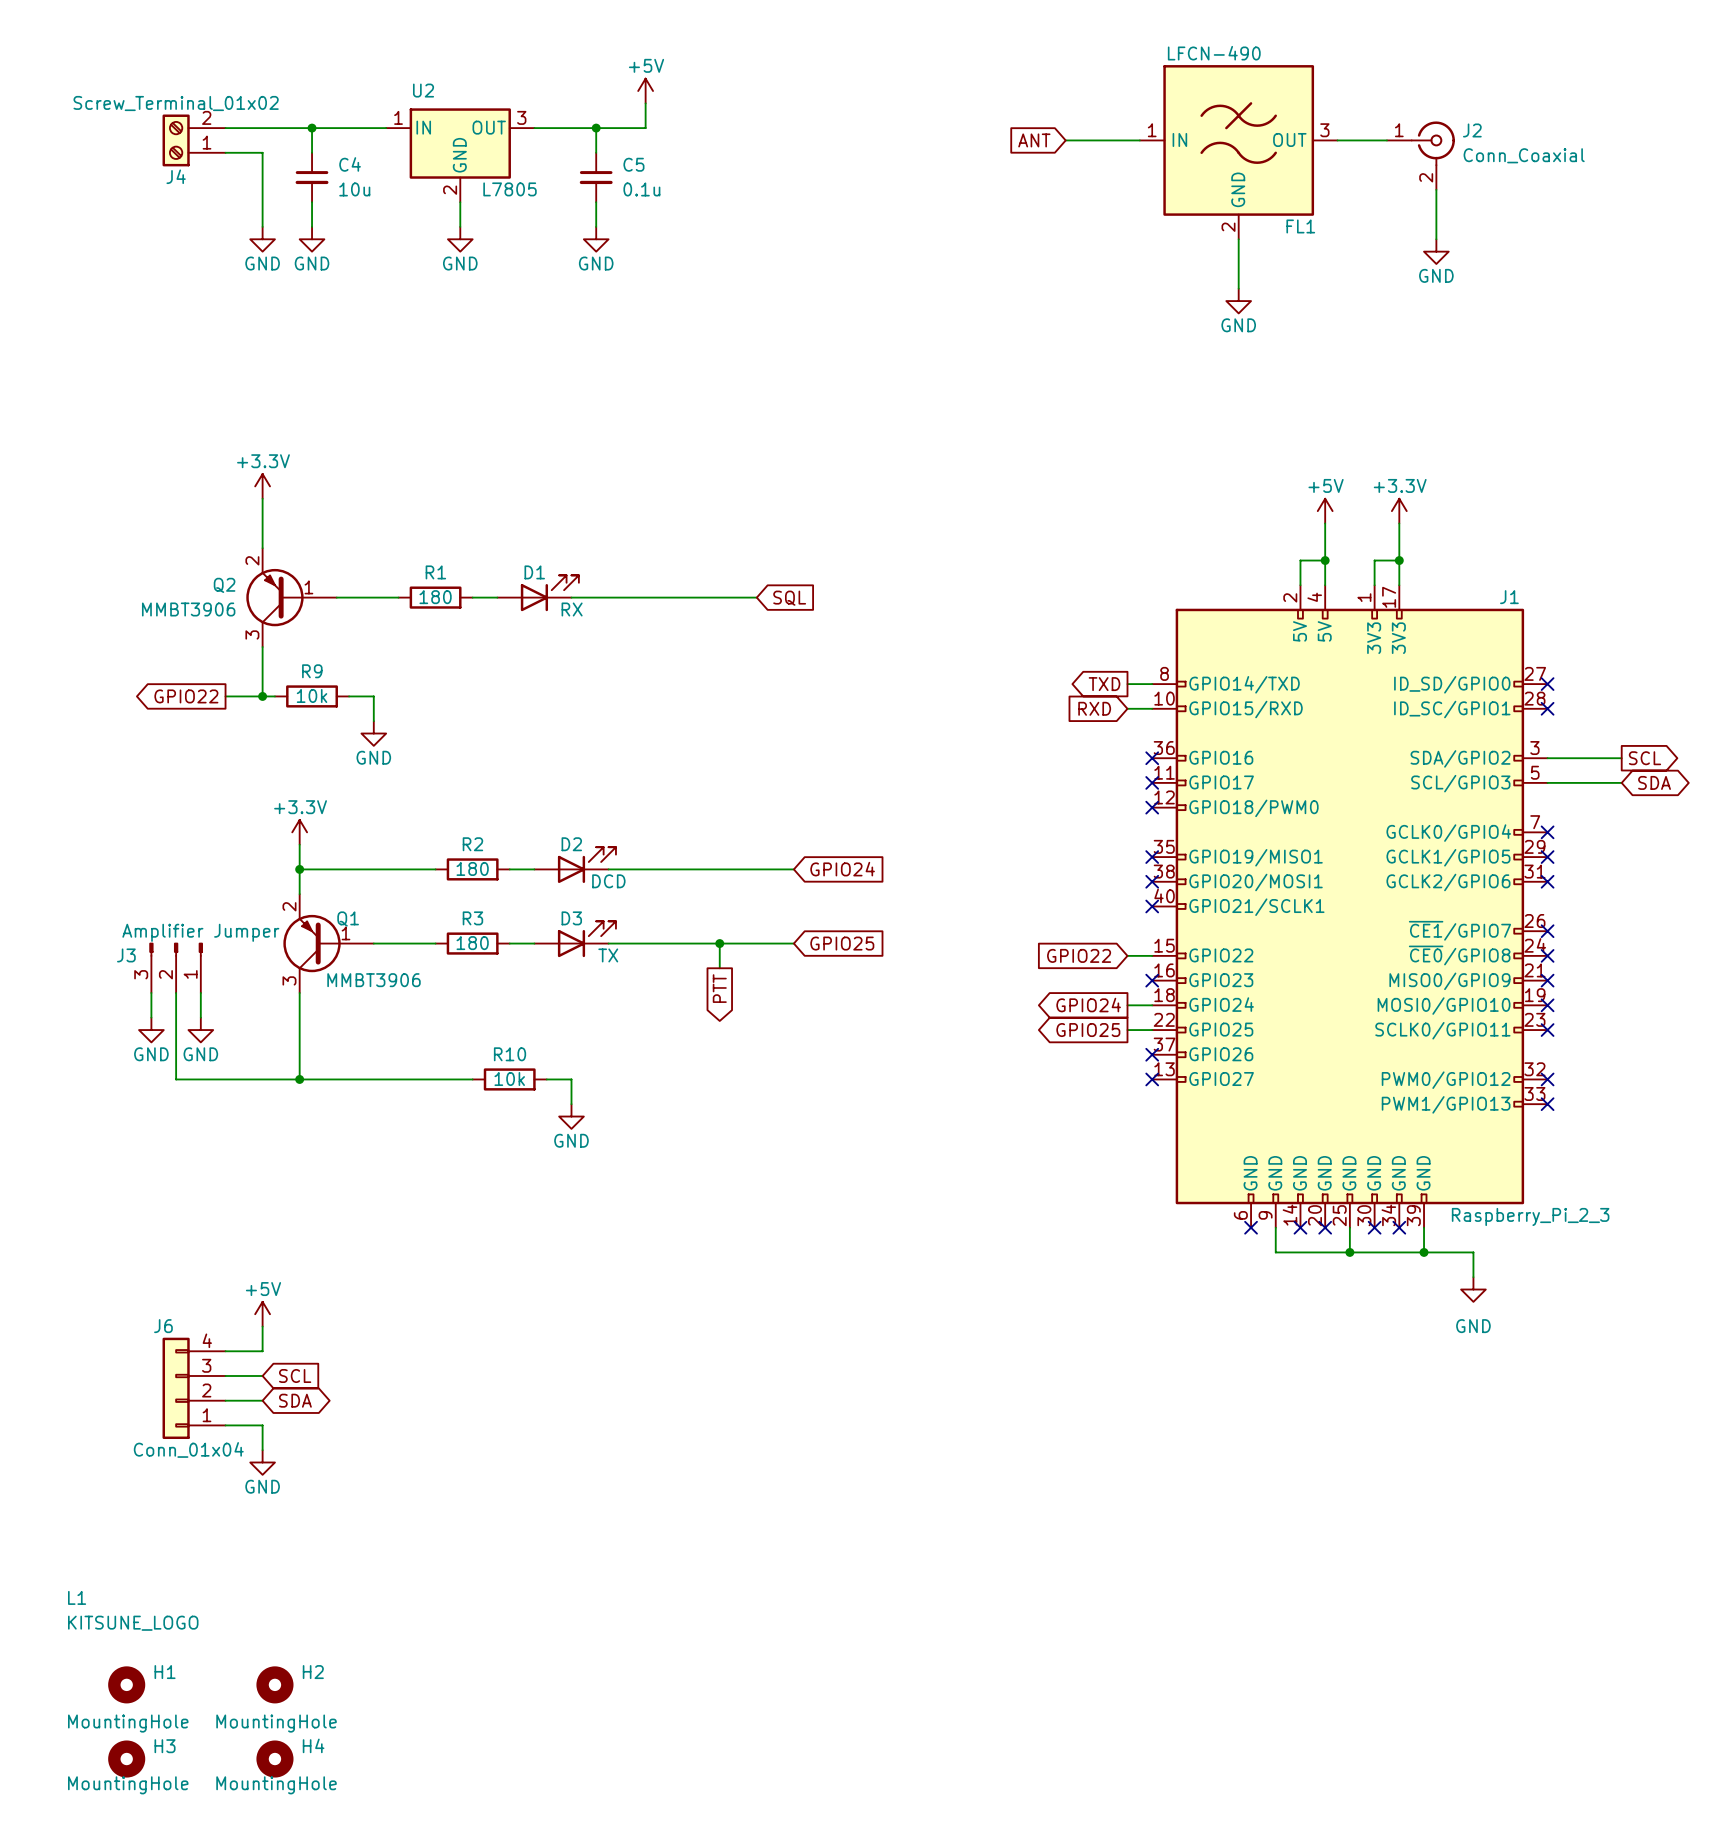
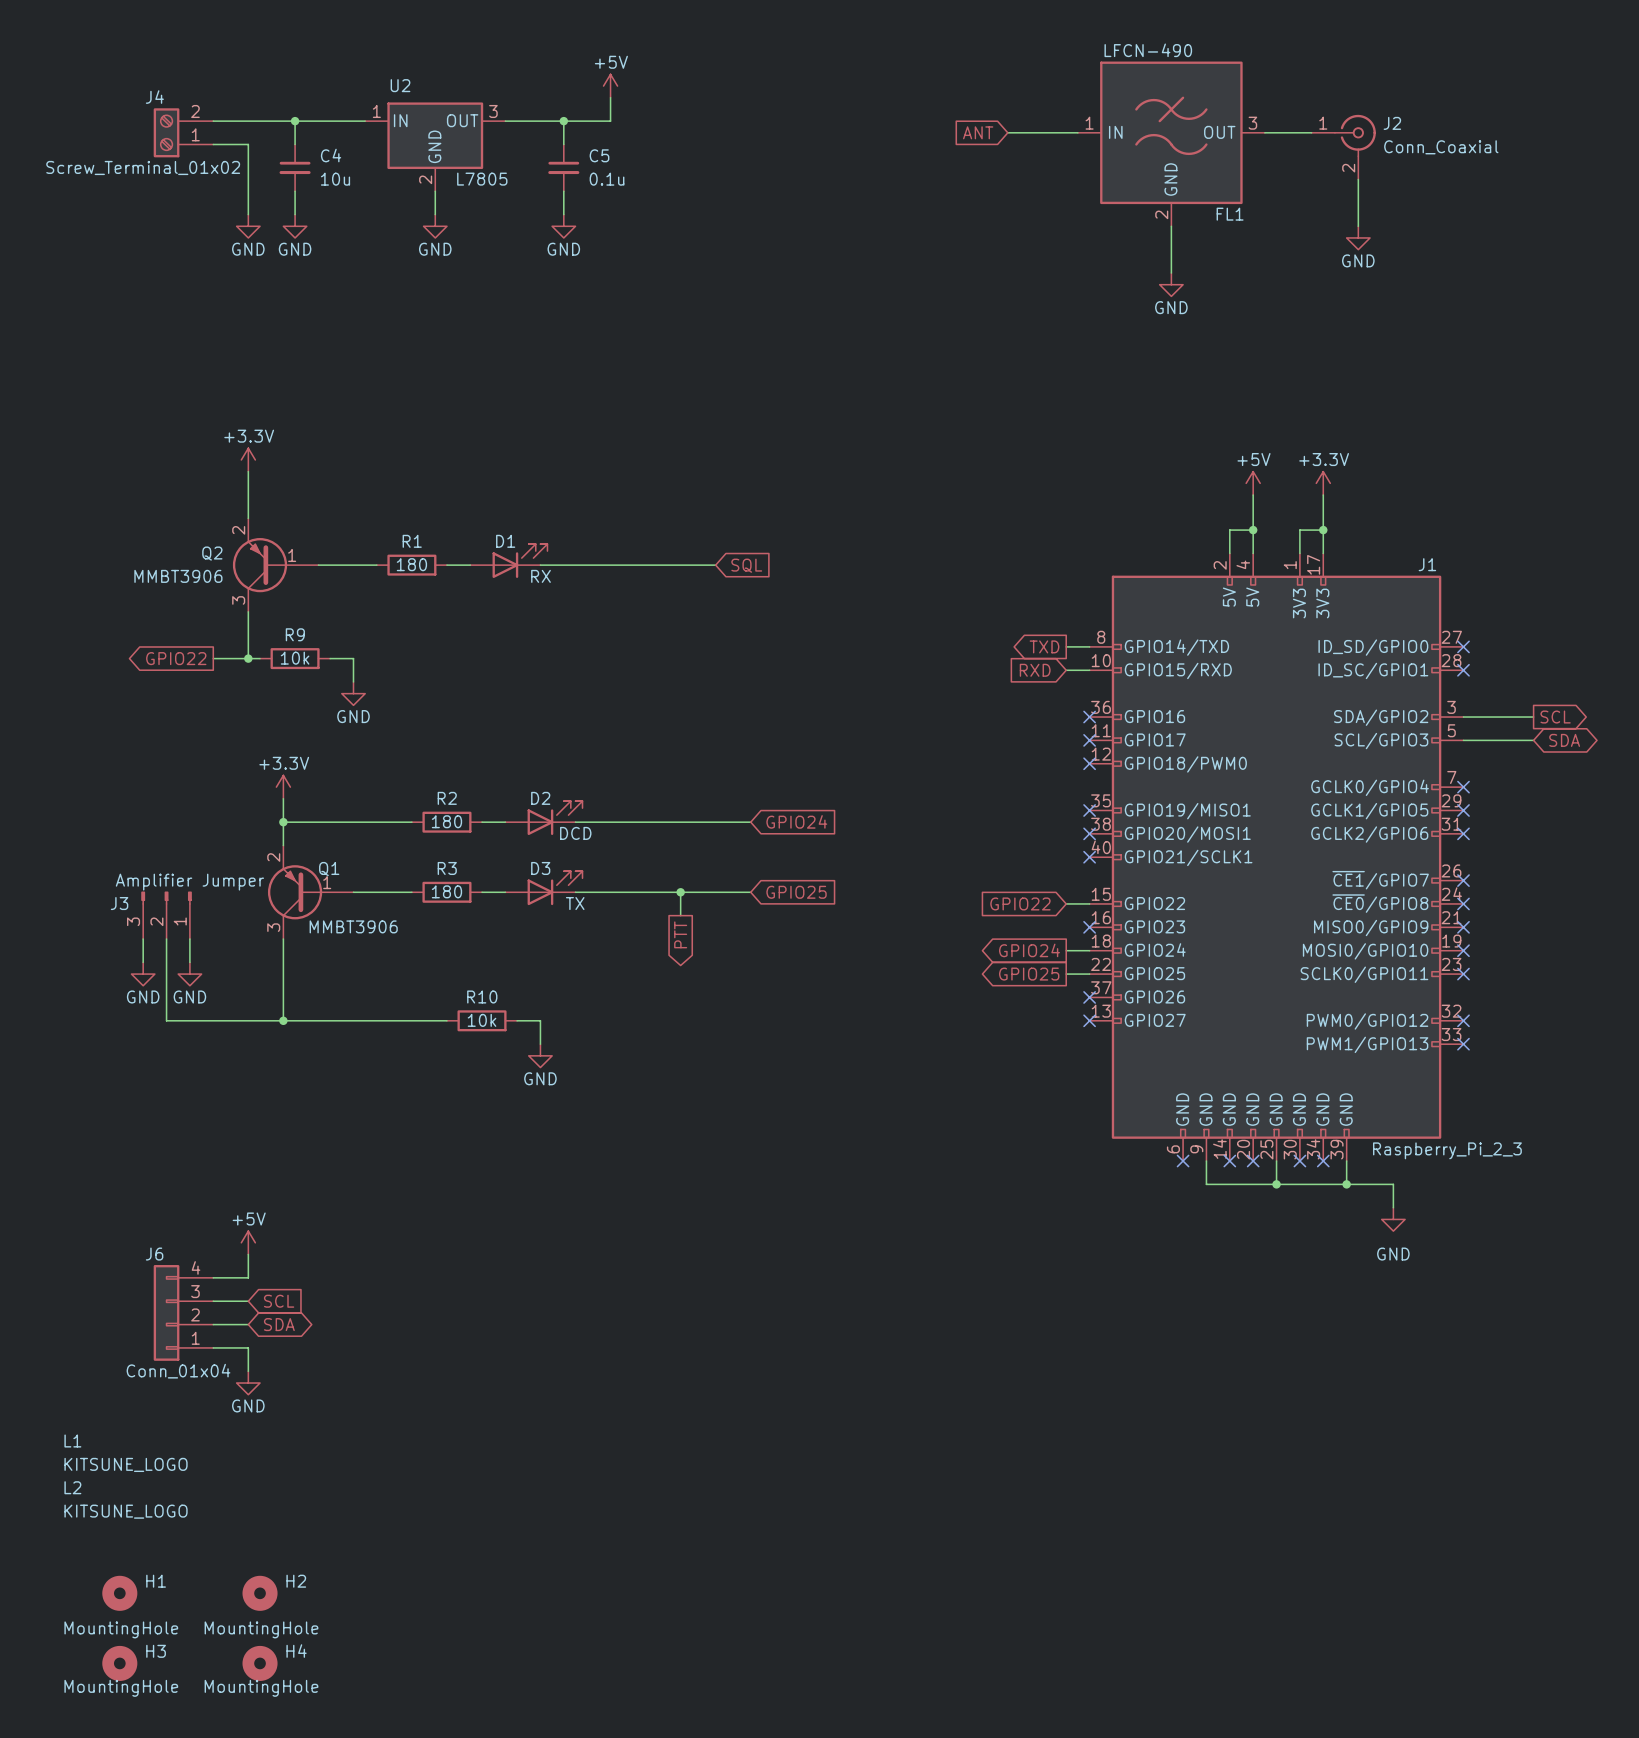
J4 value position: Screw_Terminal_01x02 (176, 103) -> Screw_Terminal_01x02 (143, 167)
J4 name position: J4 (176, 176) -> J4 (154, 97)
L2: none -> KITSUNE_LOGO (126, 1499)
L1 position: (133, 1610) -> (126, 1453)

